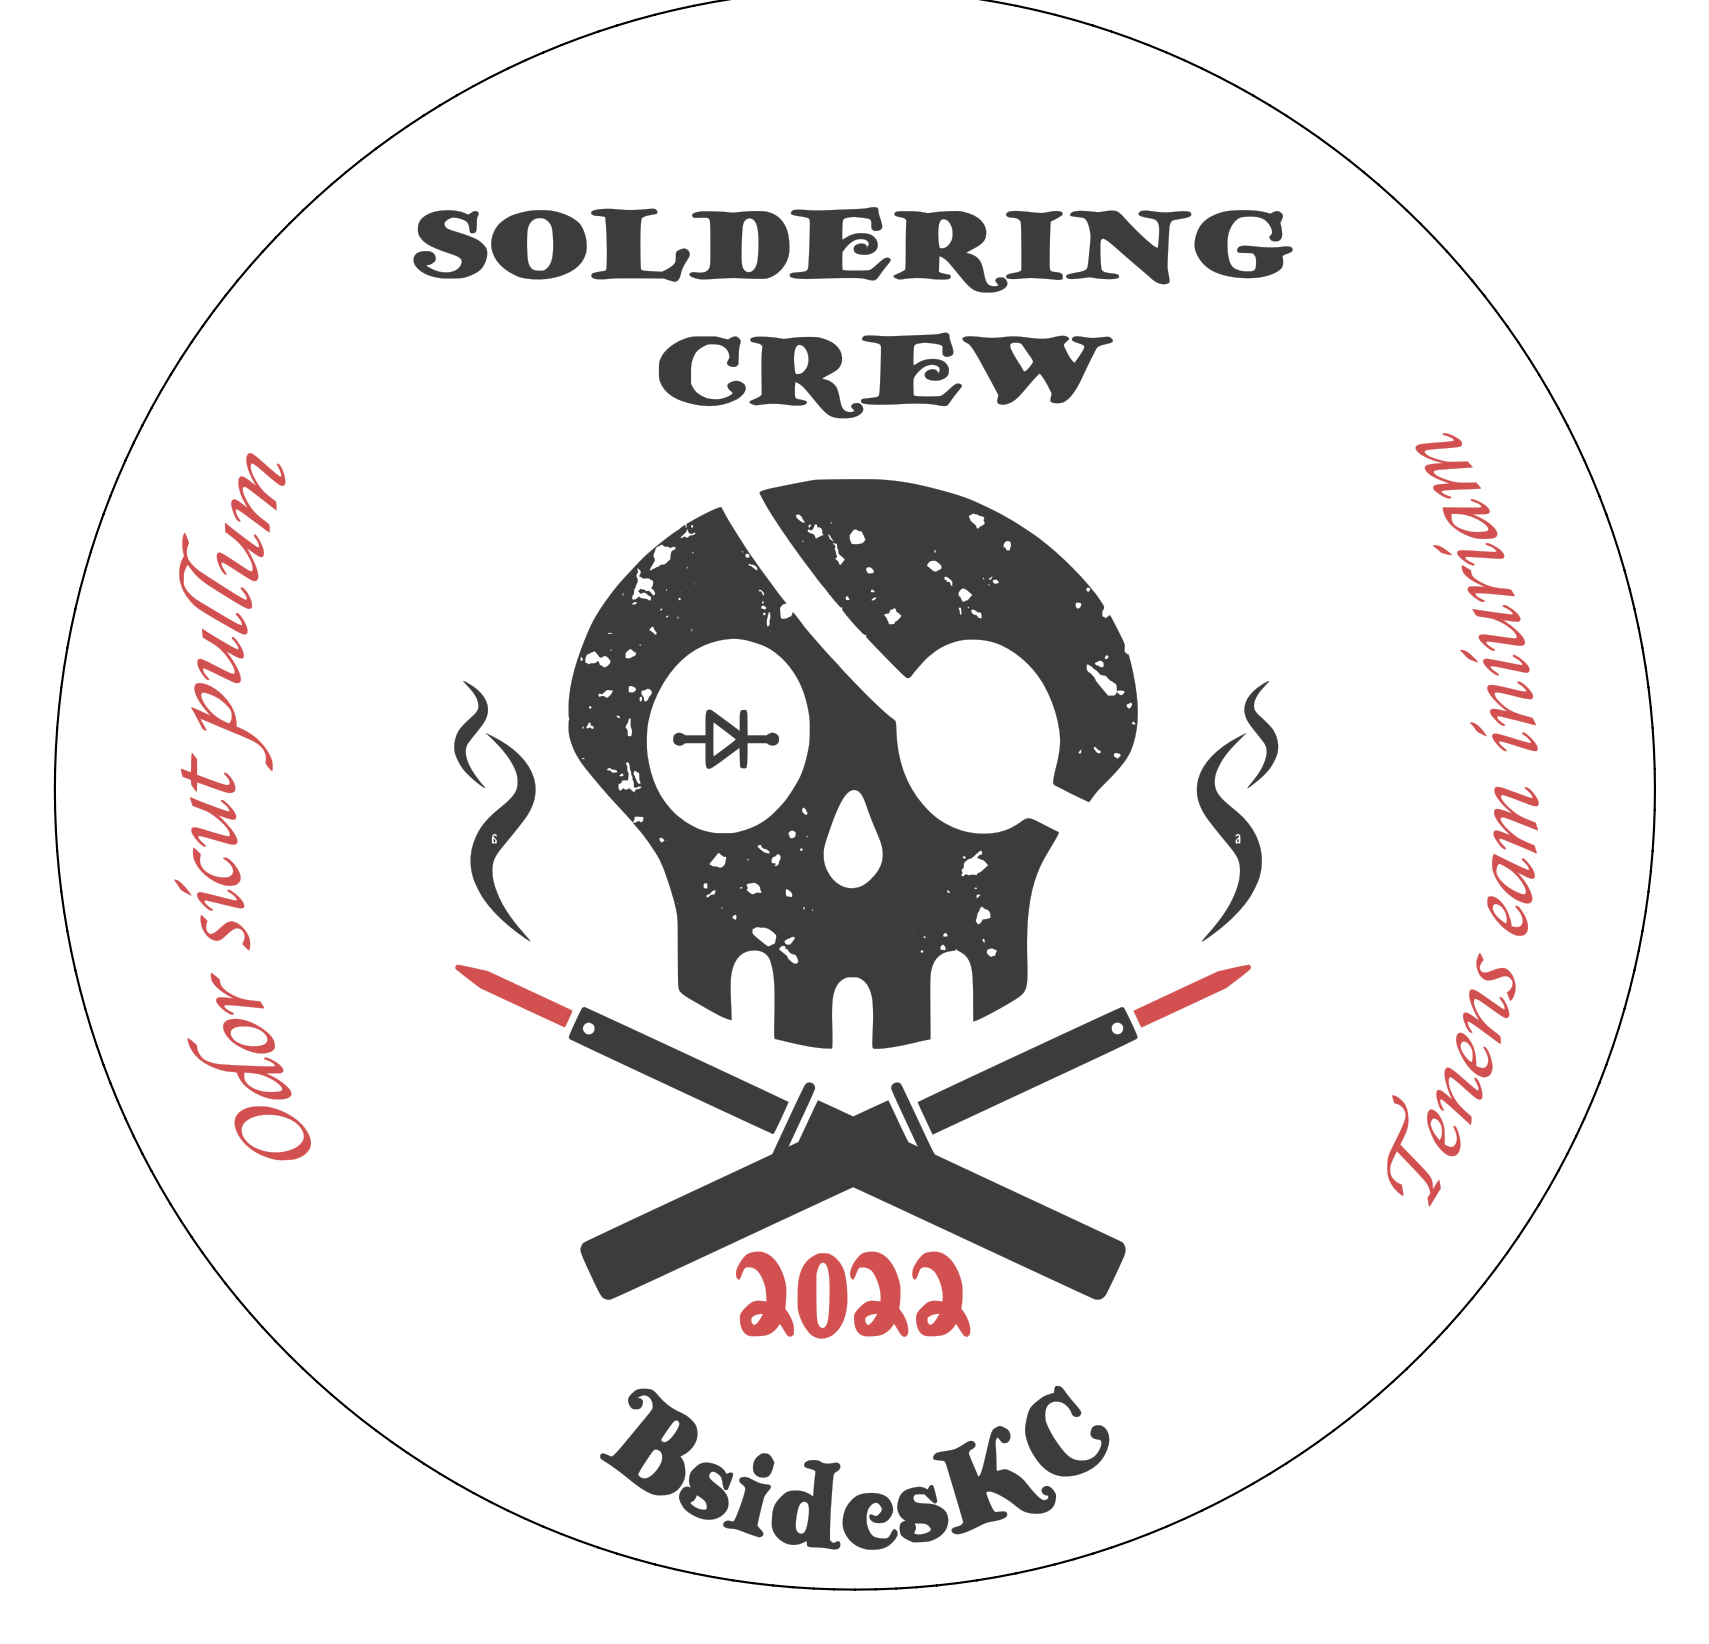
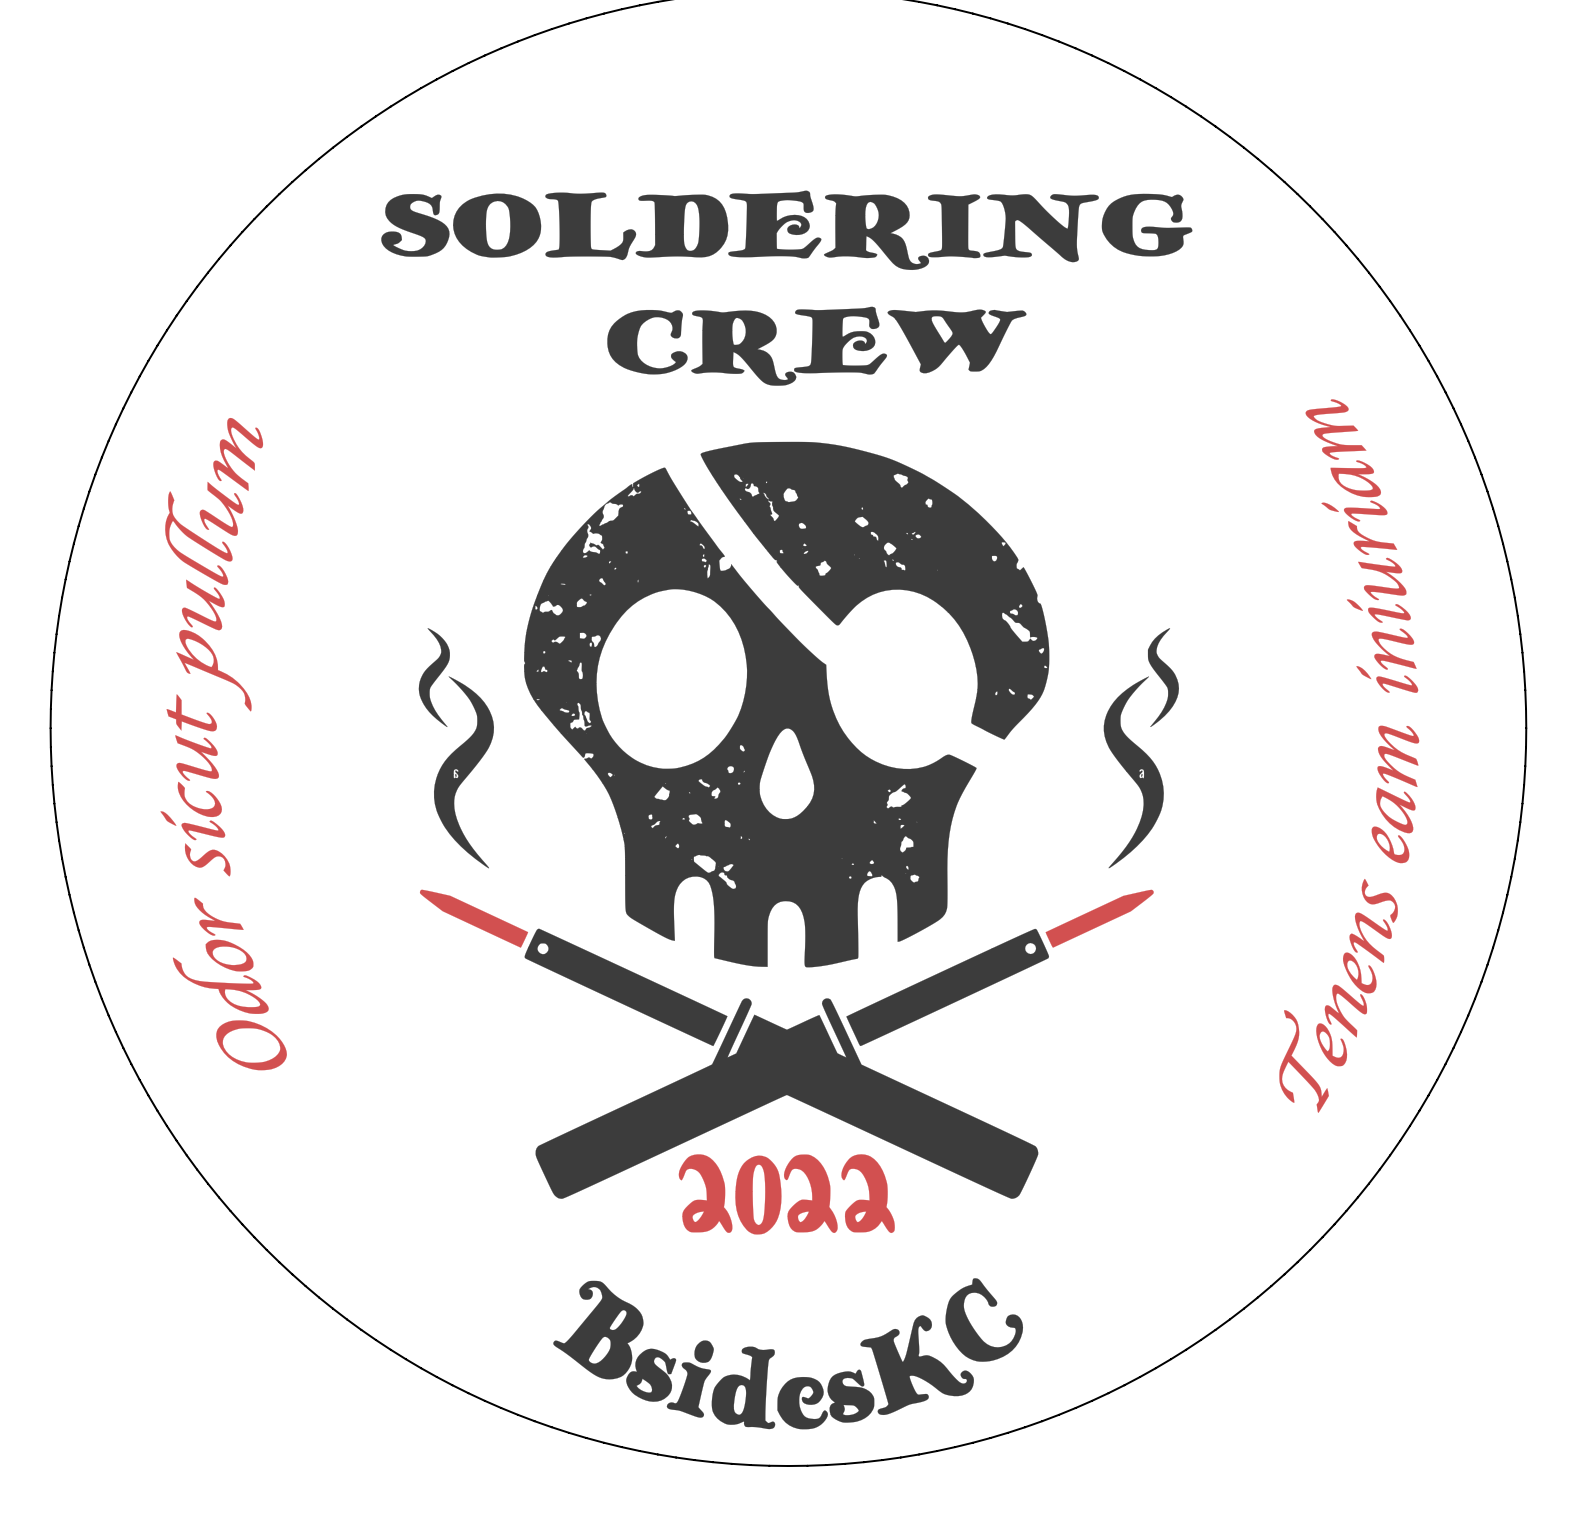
drawing shape: [413, 207, 1293, 1550] -> [381, 190, 1193, 1430]
drawing shape: [174, 433, 1539, 1339] -> [160, 399, 1420, 1235]

